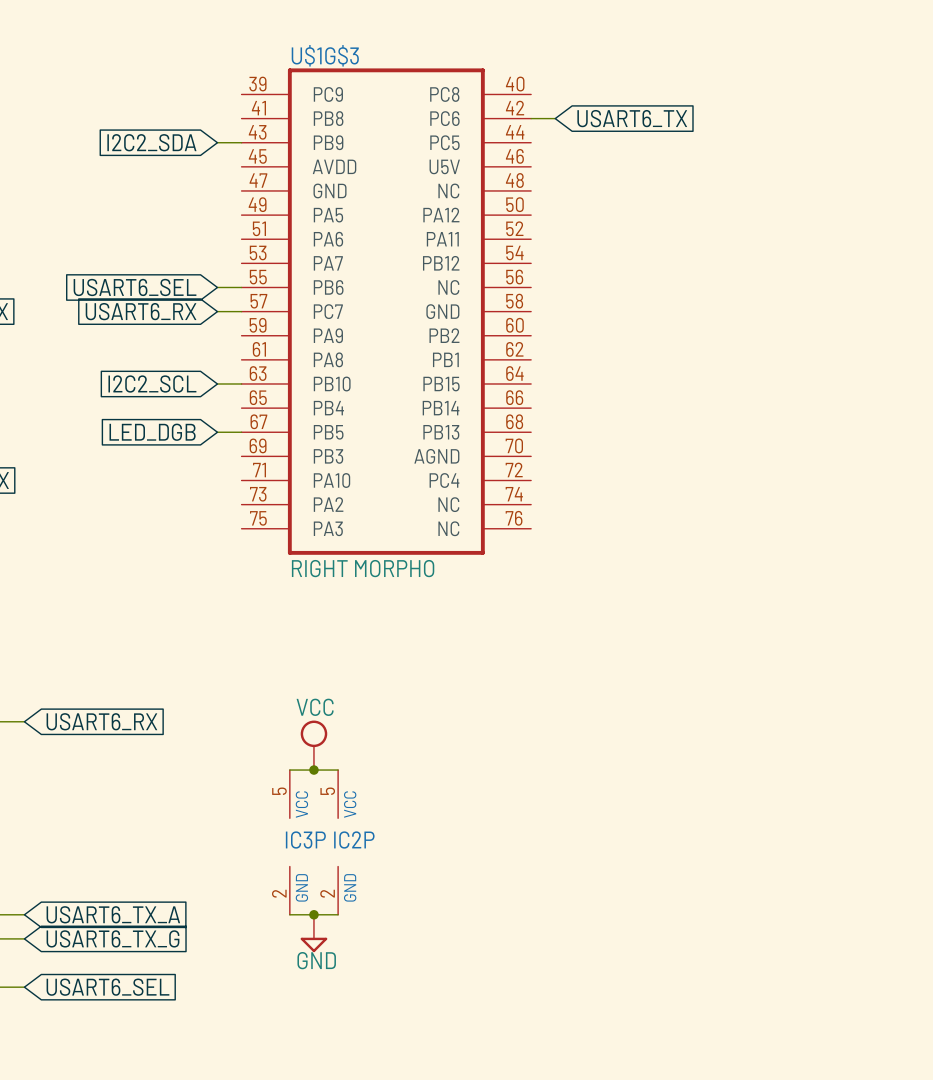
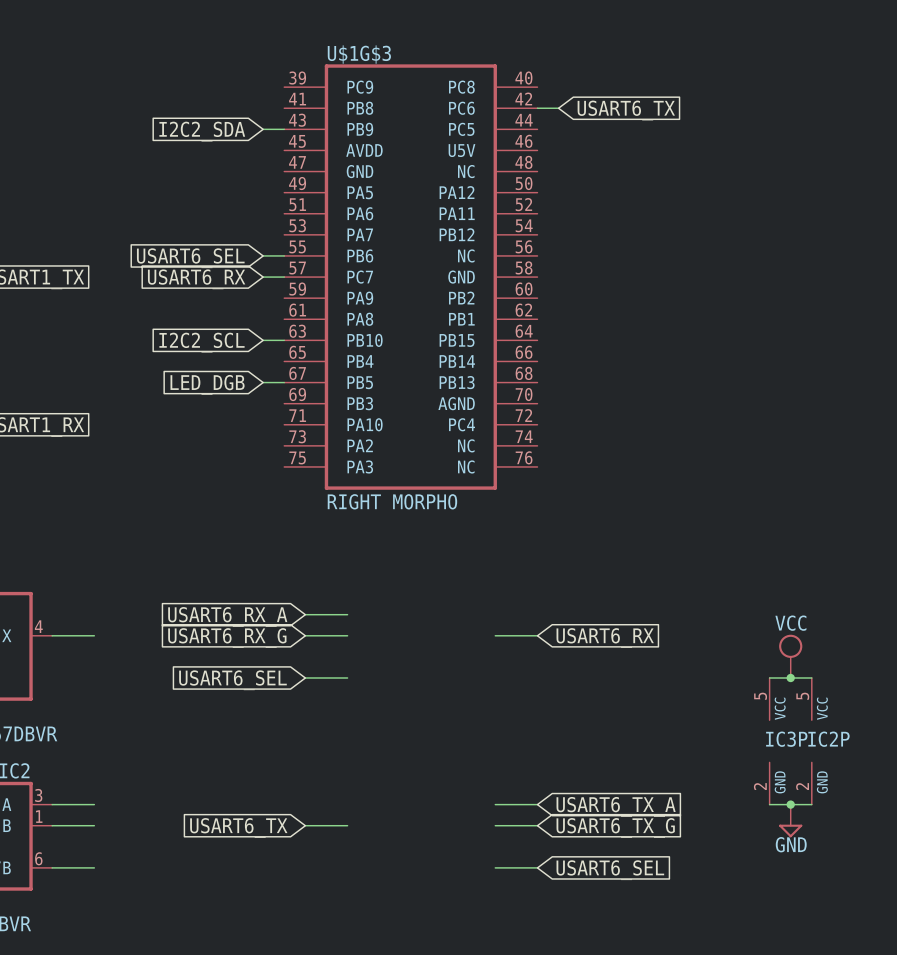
global label: none -> USART6_RX_A (227, 616)
wire: none -> (305, 614) (347, 614)
global label: USART6_RX (101, 721) -> none
global label: none -> USART6_RX_G (227, 638)
wire: none -> (305, 635) (347, 635)
wire: none -> (495, 635) (537, 635)
global label: none -> USART6_RX (605, 638)
power symbol: VCC (313, 745) -> none
power symbol: none -> VCC (790, 656)
global label: none -> USART6_SEL (232, 680)
wire: (313, 770) (338, 770) -> (305, 677) (326, 677)
junction: (313, 770) -> none
wire: none -> (769, 677) (811, 677)
junction: none -> (790, 677)
IC3P position: (289, 842) -> (769, 741)
IC2P position: (338, 842) -> (811, 741)
global label: USART6_TX_A (113, 914) -> none
wire: (289, 914) (338, 914) -> (305, 825) (347, 825)
junction: (313, 914) -> none
wire: none -> (495, 804) (537, 804)
global label: none -> USART6_TX_A (616, 806)
wire: none -> (769, 804) (811, 804)
junction: none -> (790, 804)
power symbol: GND (313, 933) -> none
power symbol: none -> GND (790, 820)
global label: USART6_TX_G (112, 938) -> none
global label: none -> USART6_TX (238, 827)
wire: none -> (495, 825) (537, 825)
global label: none -> USART6_TX_G (615, 827)
global label: USART6_SEL (107, 987) -> none
wire: none -> (495, 867) (537, 867)
global label: none -> USART6_SEL (610, 870)

